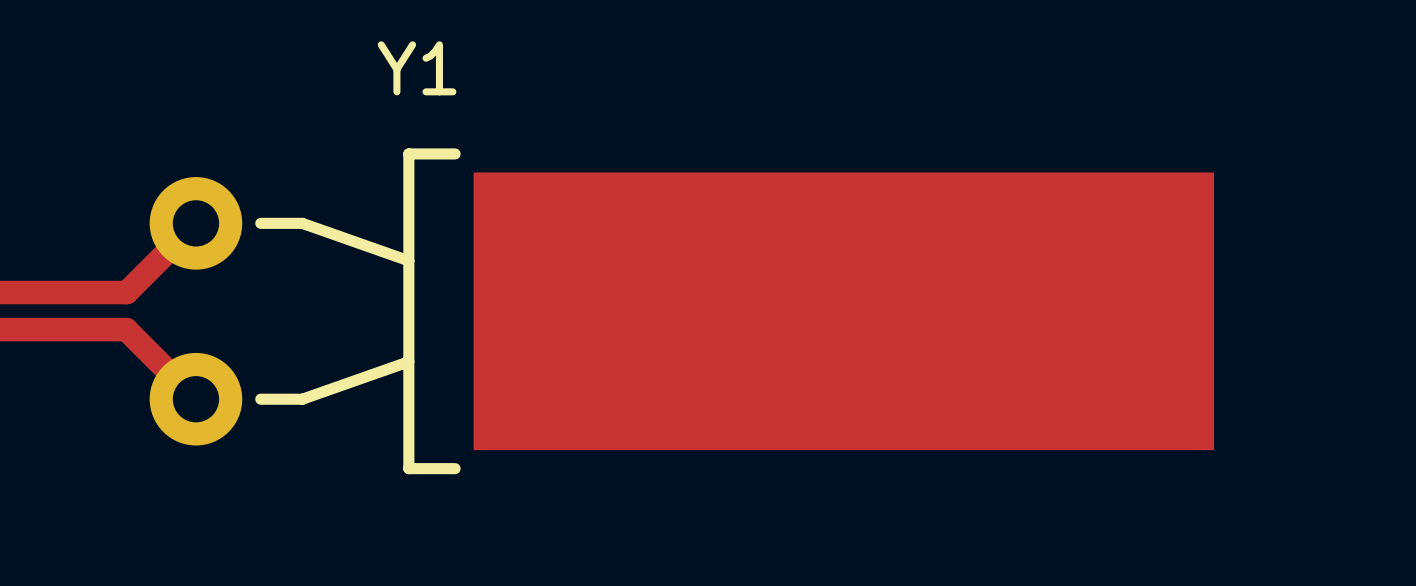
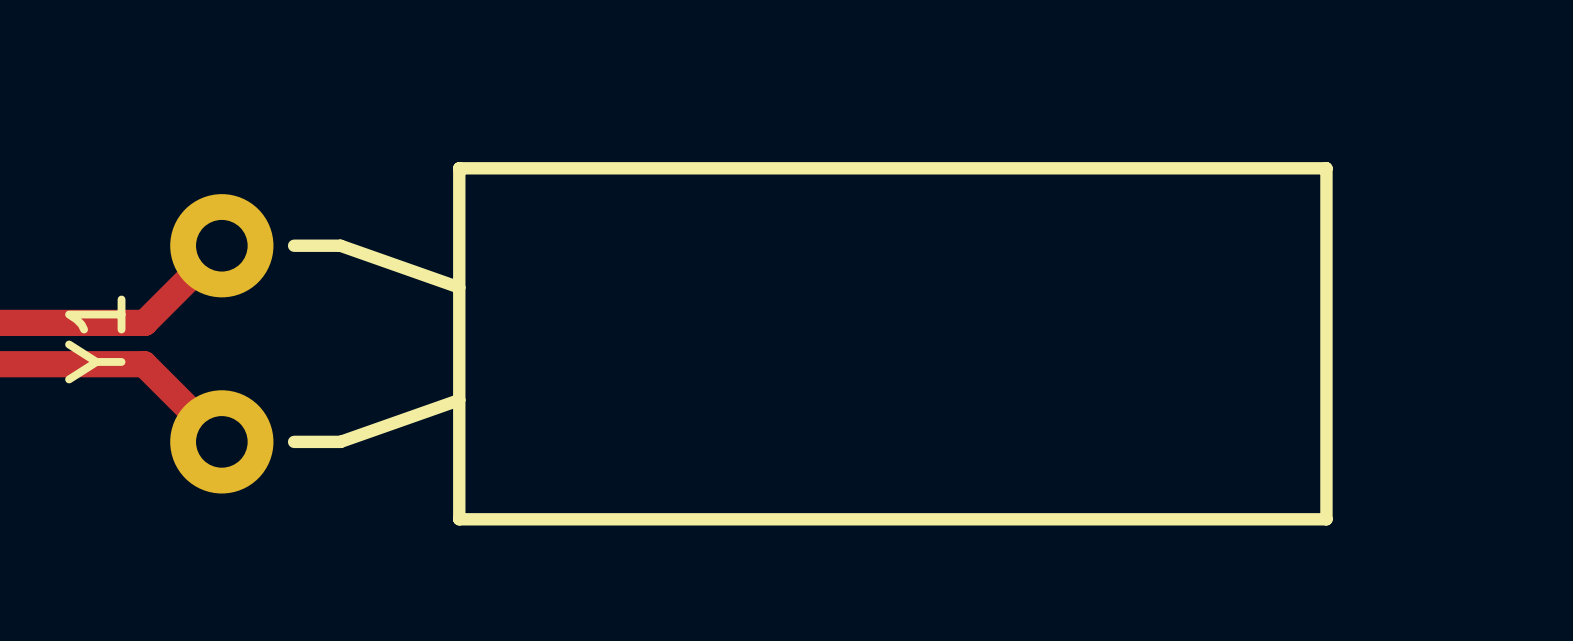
Y1 name position: Y1 (417, 68) -> Y1 (95, 339)
Y1 footprint: [149, 148, 1215, 475] -> [170, 162, 1333, 526]

